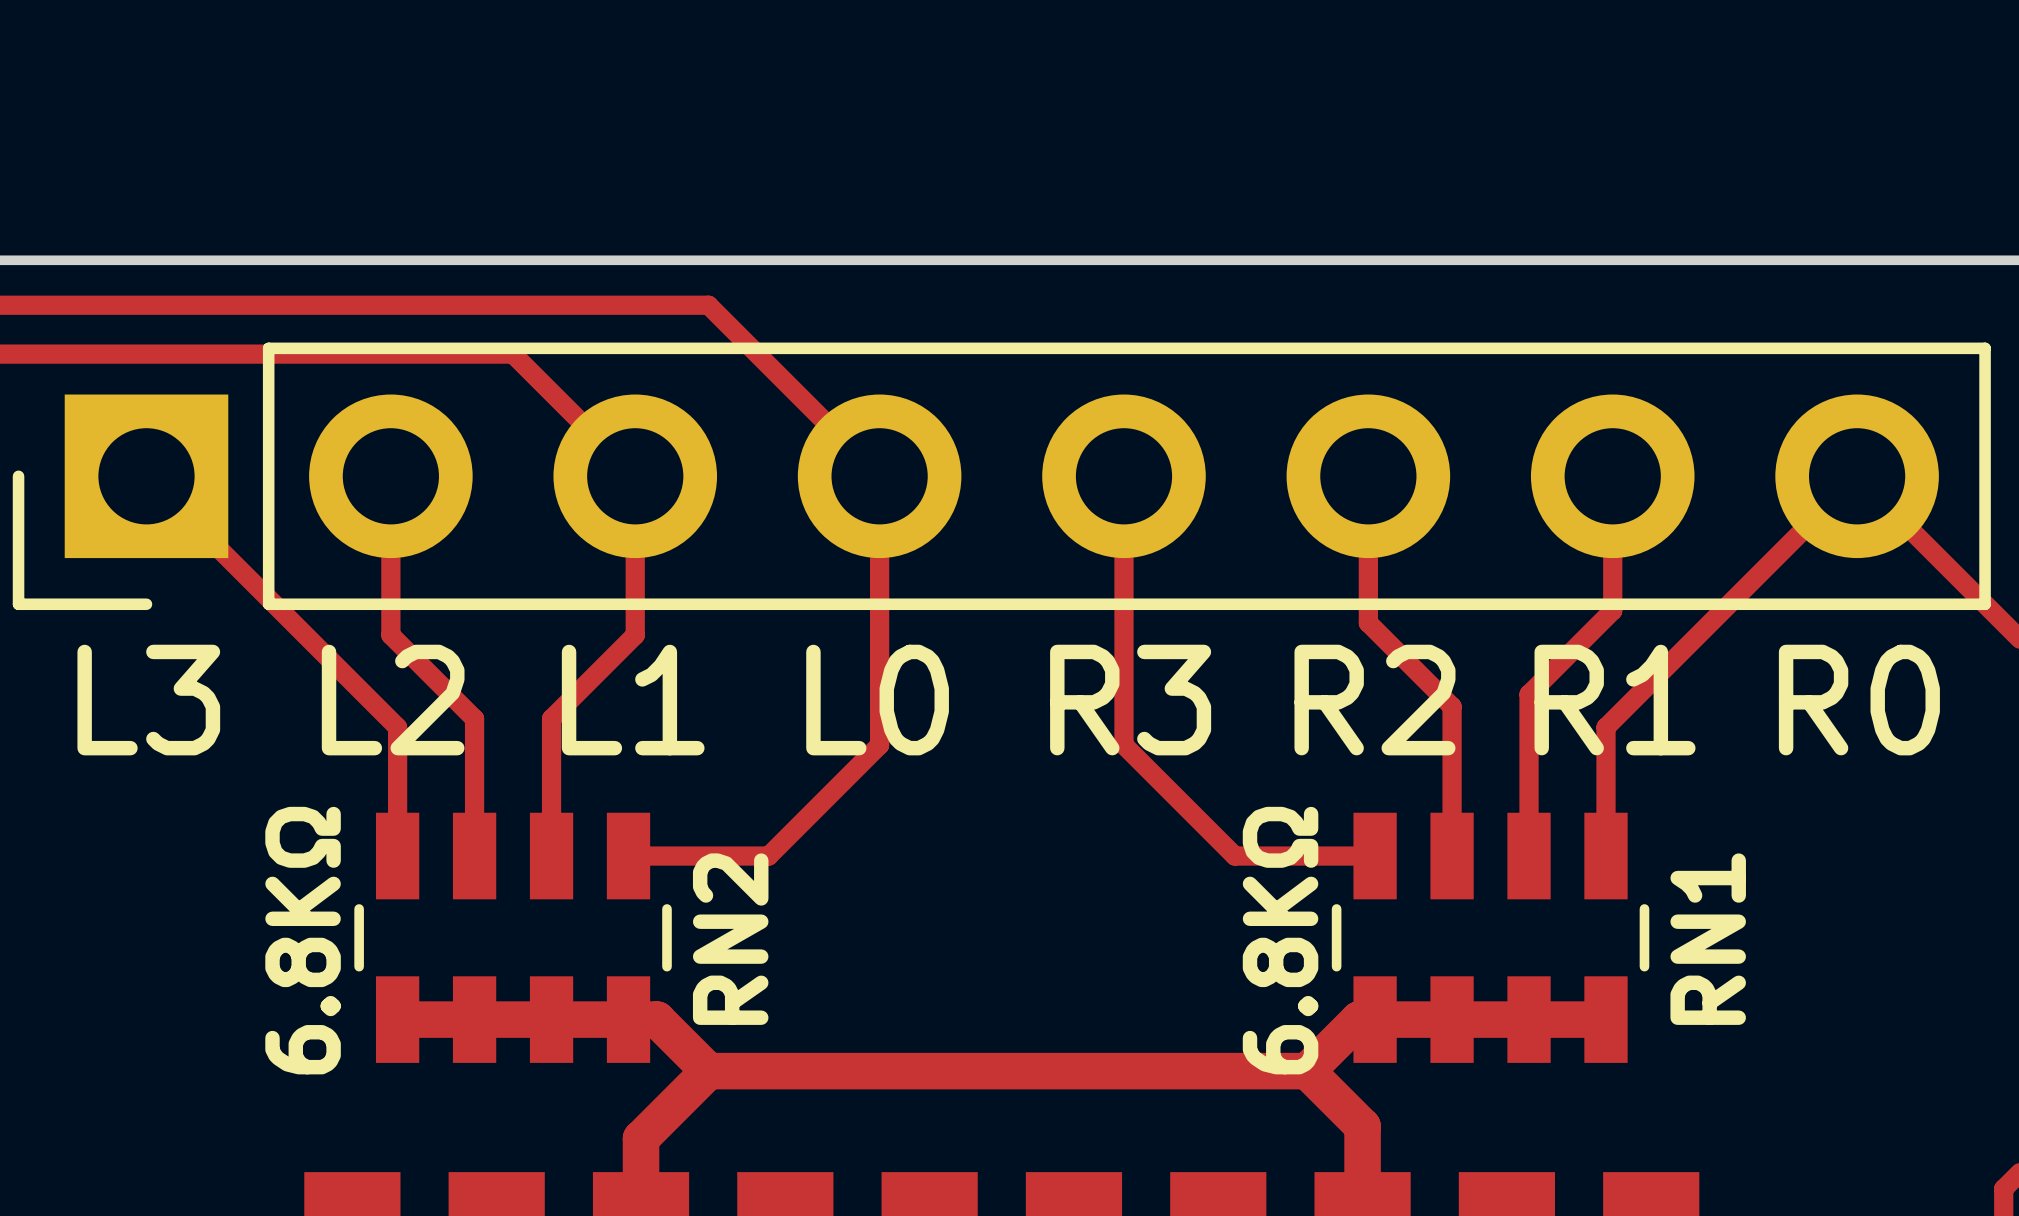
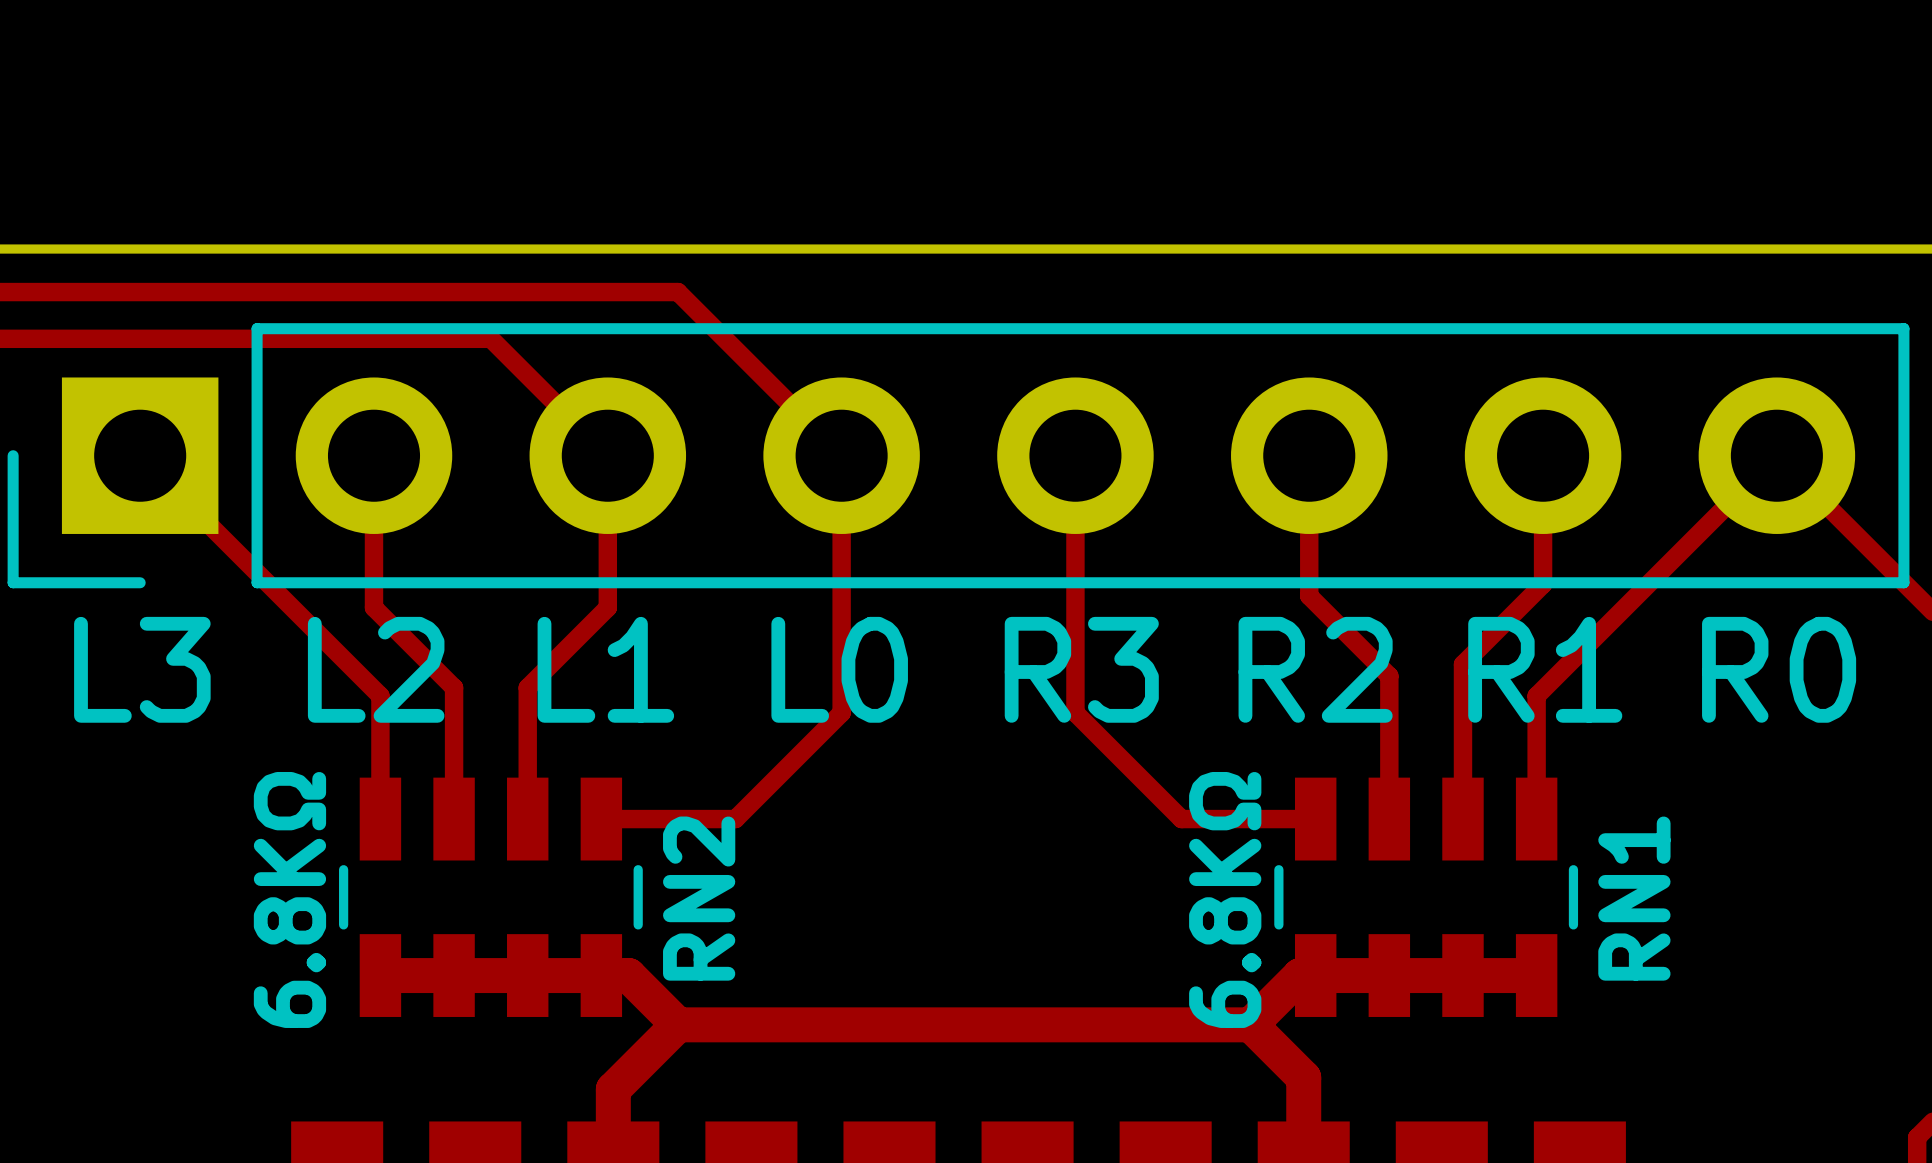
part footprint: [12, 342, 1991, 611] -> [7, 323, 1910, 589]

